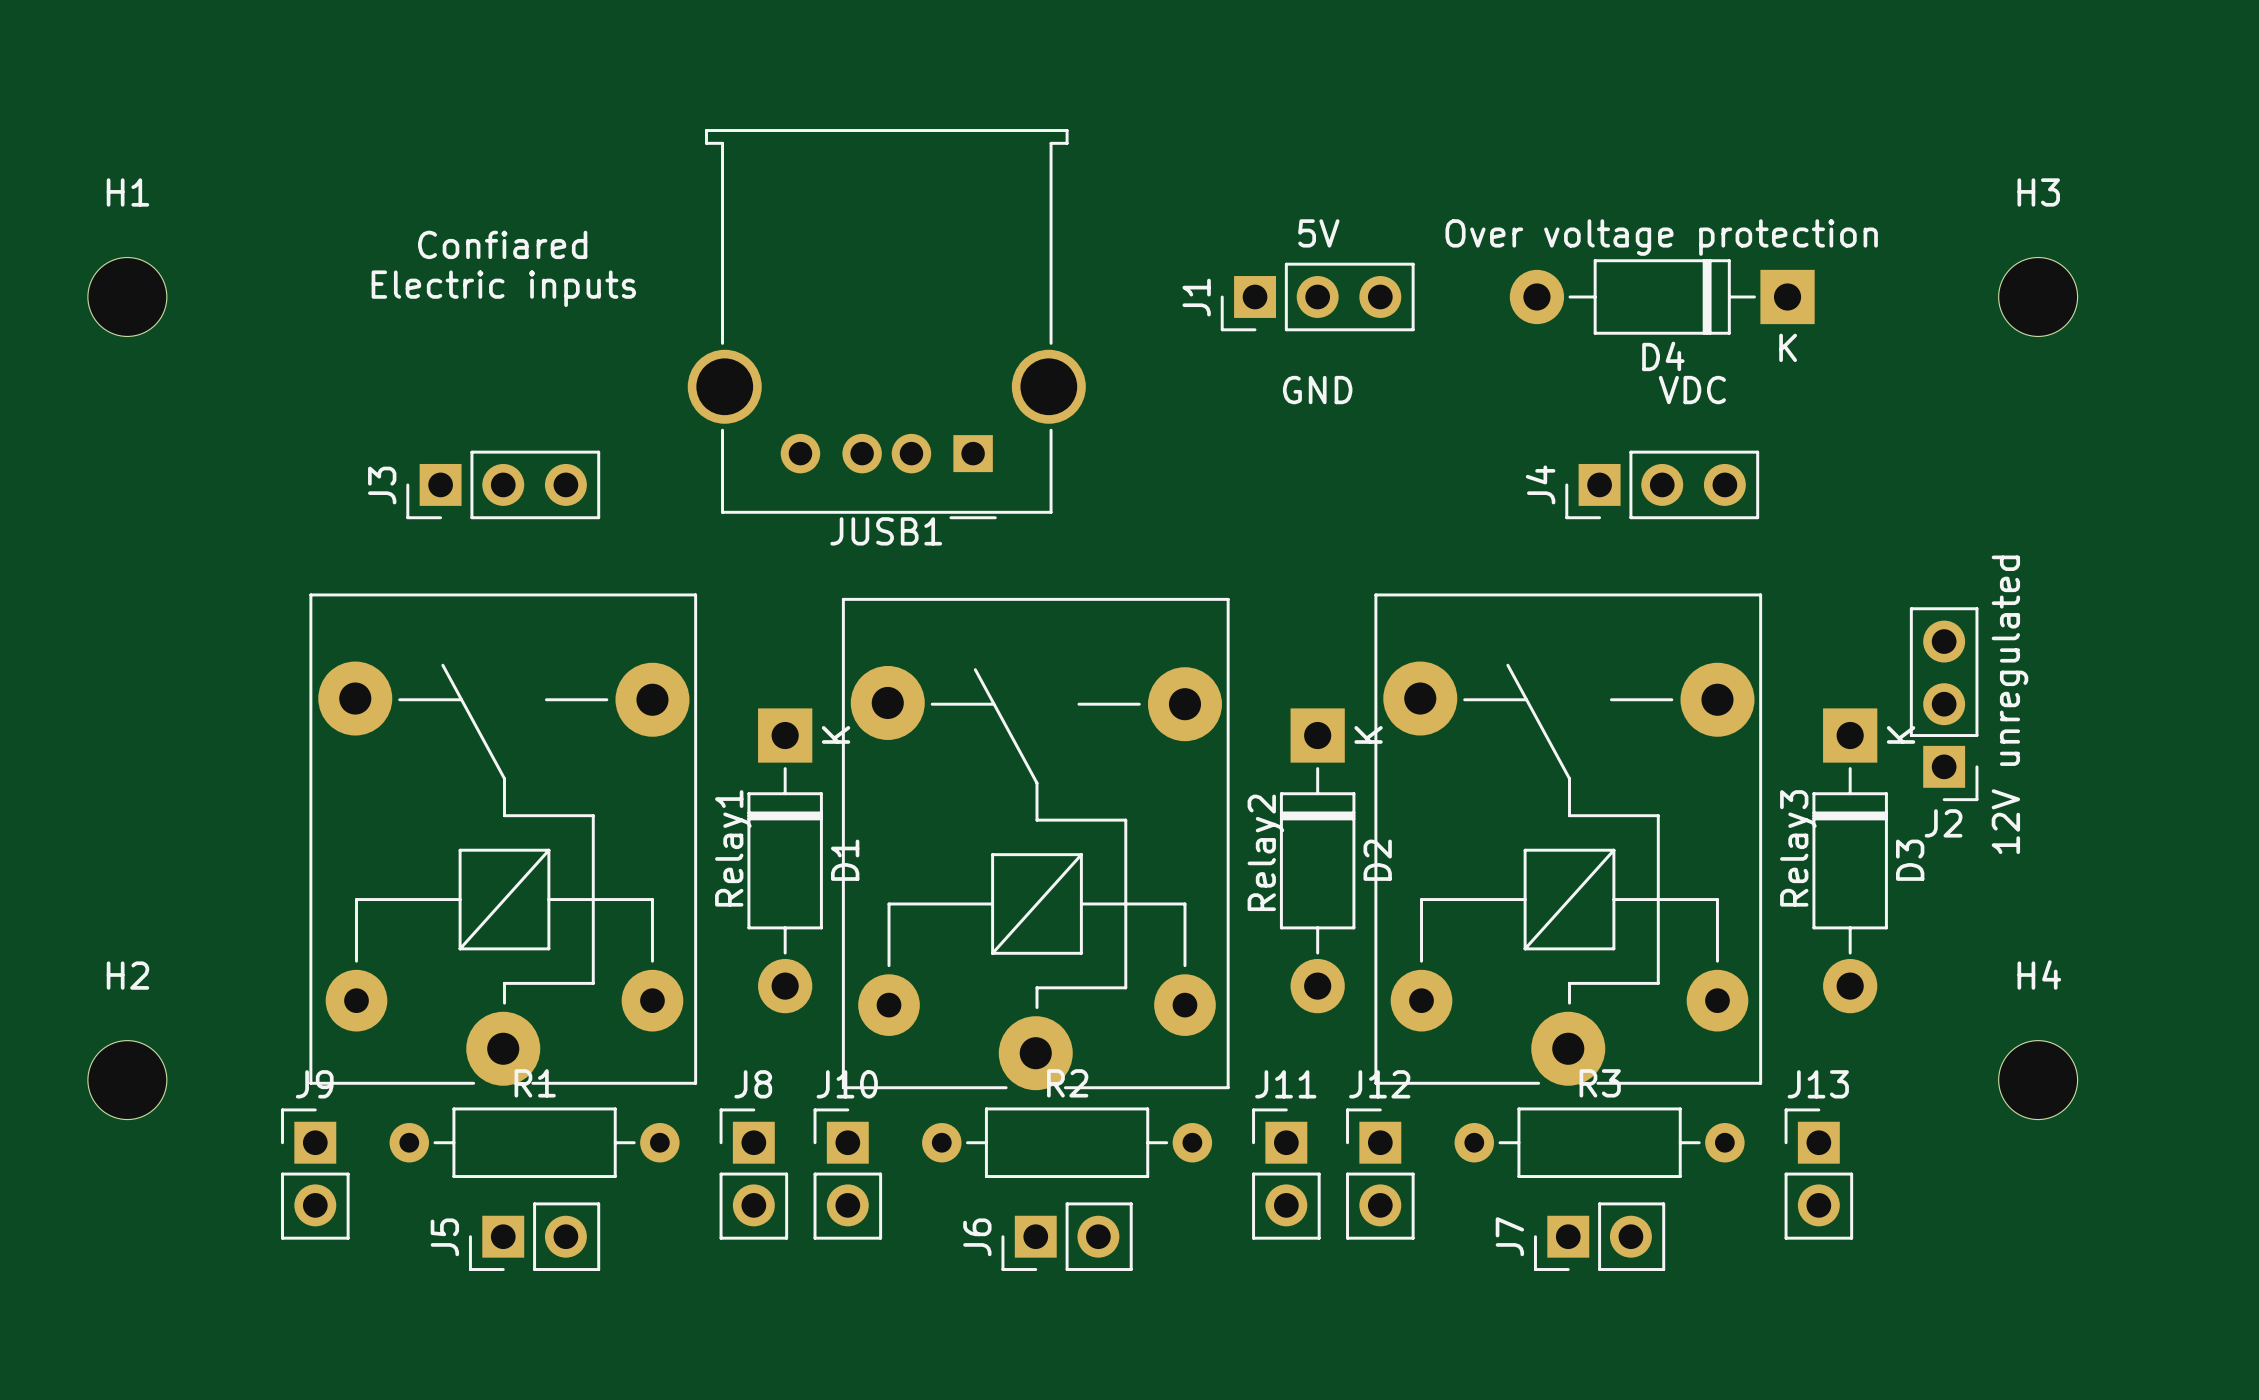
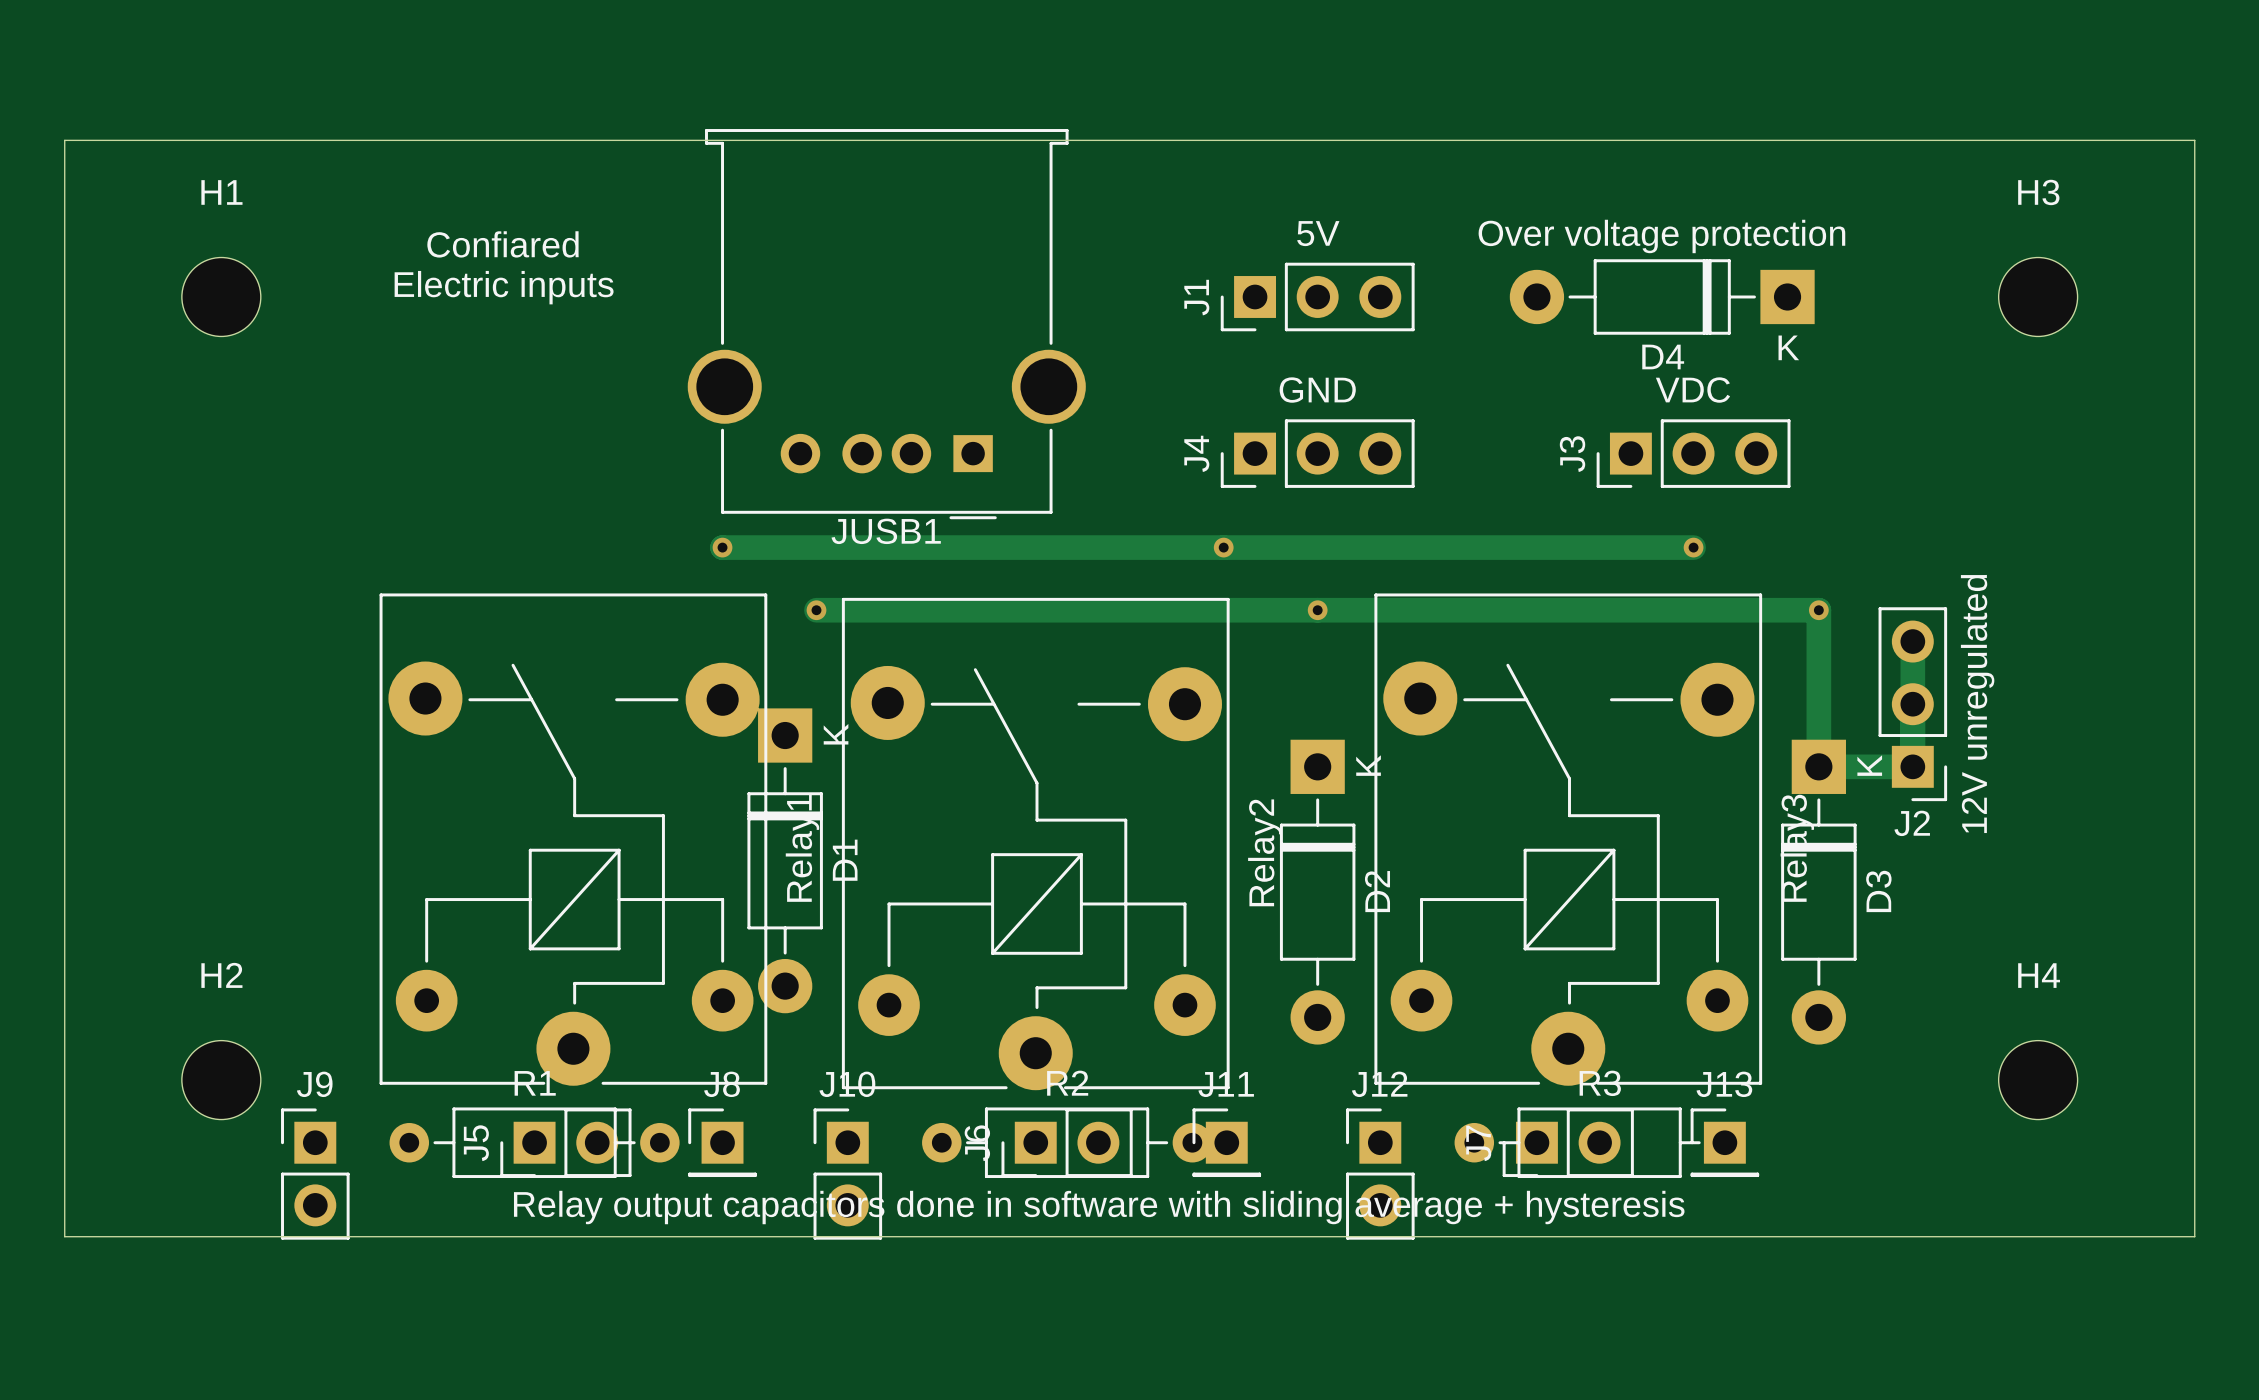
board edge: none -> (64, 140) (64, 1236) (2194, 1236) (2194, 140) (64, 140)
H1 position: (127, 296) -> (221, 296)
J3 position: (503, 484) -> (1693, 453)
J4 position: (1662, 484) -> (1317, 453)
track: none -> (722, 547) (1693, 547)
via: none -> (722, 547)
via: none -> (1223, 547)
via: none -> (1693, 547)
track: none -> (816, 610) (1818, 610) (1818, 766) (1912, 766) (1912, 641)
via: none -> (816, 610)
via: none -> (1317, 610)
via: none -> (1818, 610)
J2 position: (1944, 704) -> (1912, 704)
text position: 12V unregulated (2009, 704) -> 12V unregulated (1977, 703)
Relay1 position: (503, 839) -> (573, 839)
D2 position: (1317, 860) -> (1317, 892)
D3 position: (1850, 860) -> (1818, 892)
H2 position: (127, 1080) -> (221, 1080)
J8 footprint: [719, 1108, 789, 1240] -> [688, 1108, 757, 1178]
J11 footprint: [1252, 1108, 1321, 1240] -> [1192, 1108, 1262, 1178]
J13 footprint: [1784, 1108, 1854, 1240] -> [1690, 1108, 1760, 1178]
text: none -> Relay output capacitors done in software with sliding average + hysteresis (1099, 1207)
J5 position: (534, 1236) -> (565, 1142)
J6 position: (1067, 1236) -> (1067, 1142)
J7 position: (1599, 1236) -> (1568, 1142)

